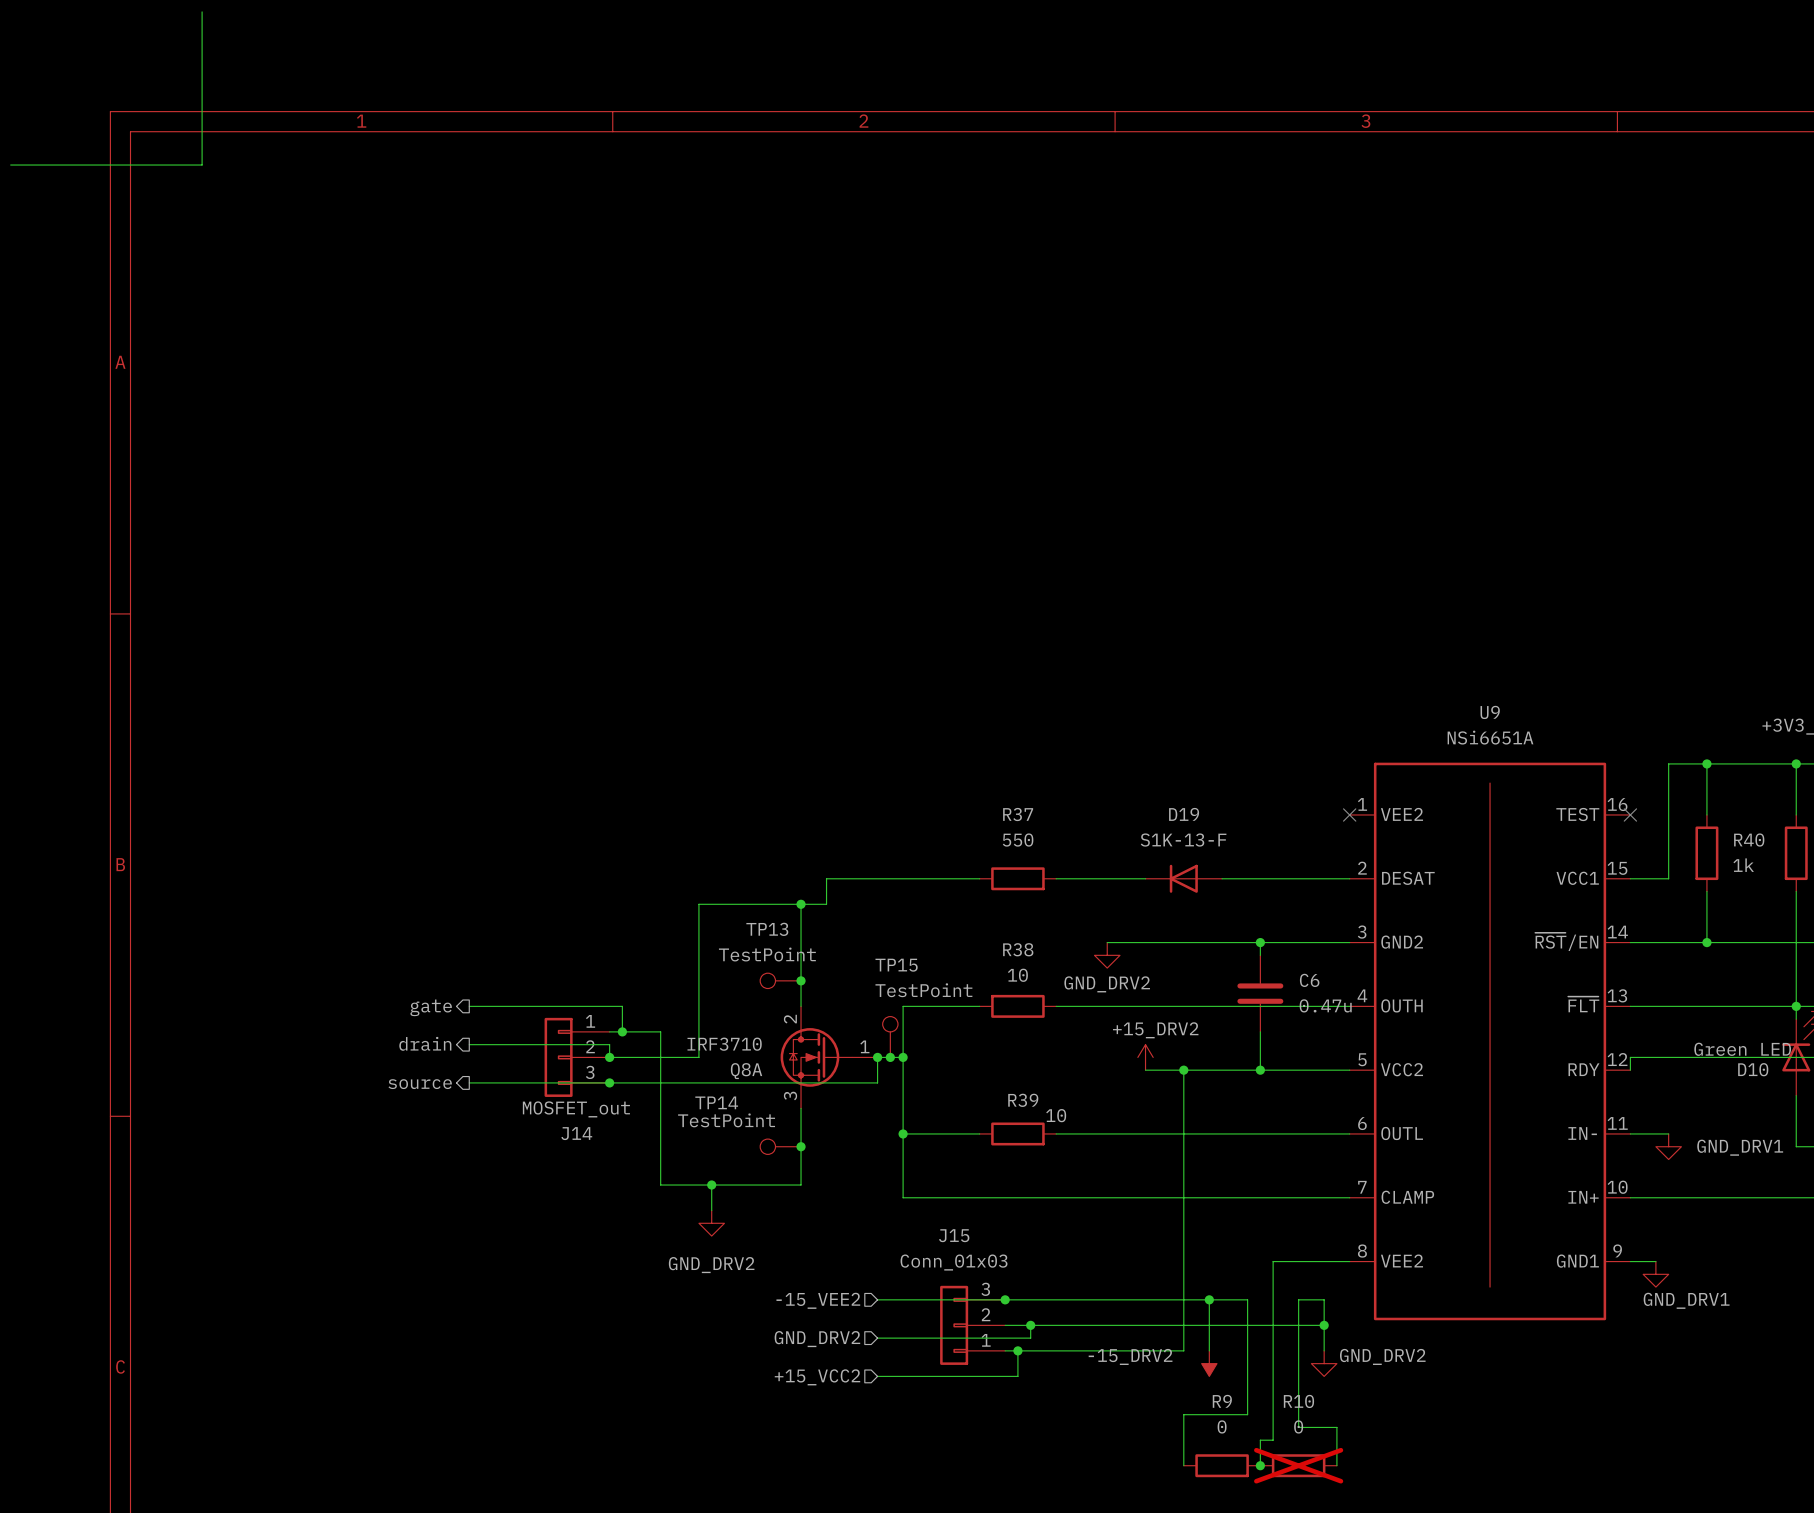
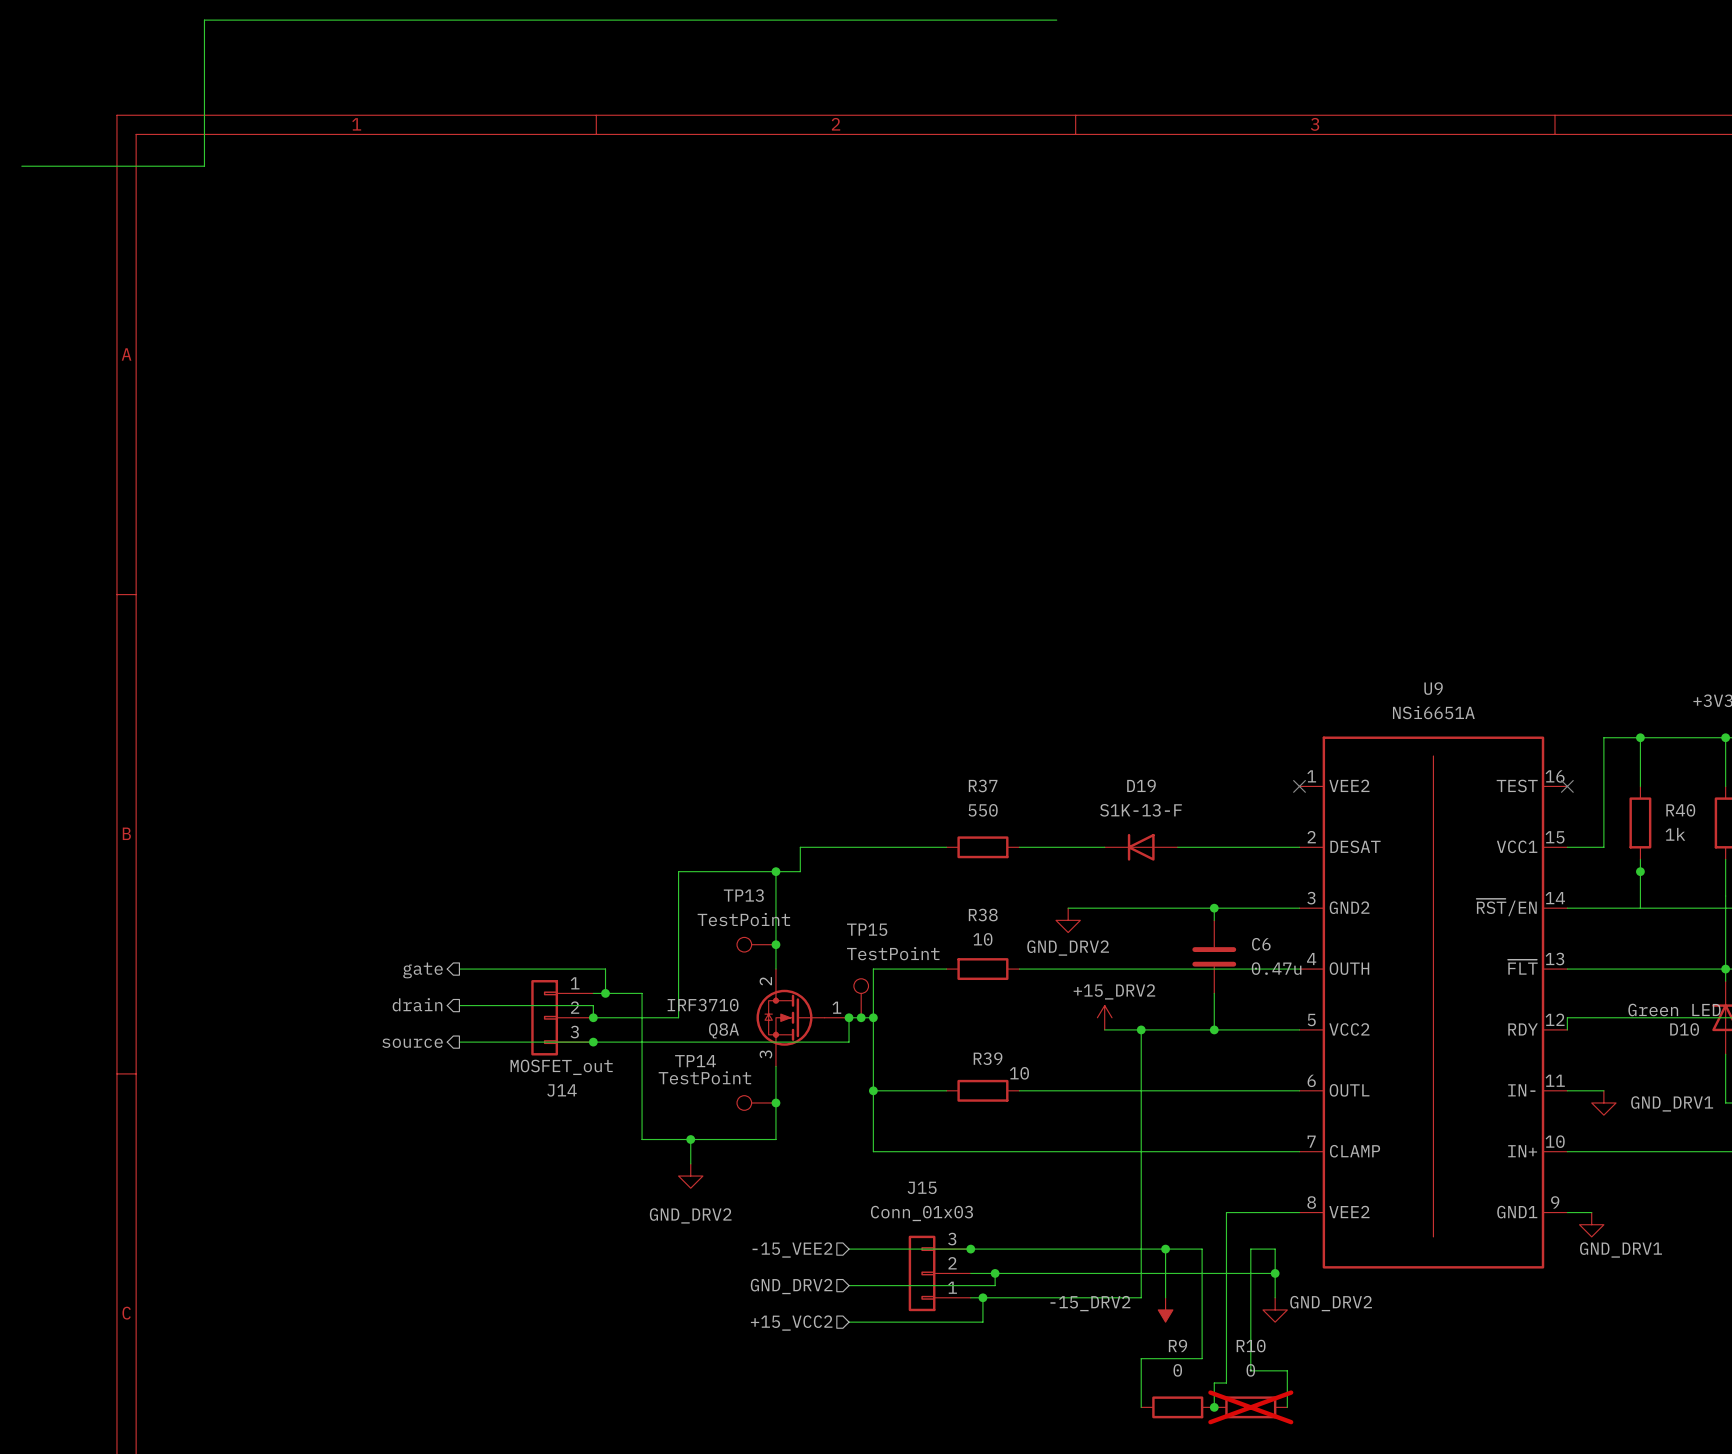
wire: none -> (204, 20) (1056, 20)
junction position: (1706, 942) -> (1640, 871)

